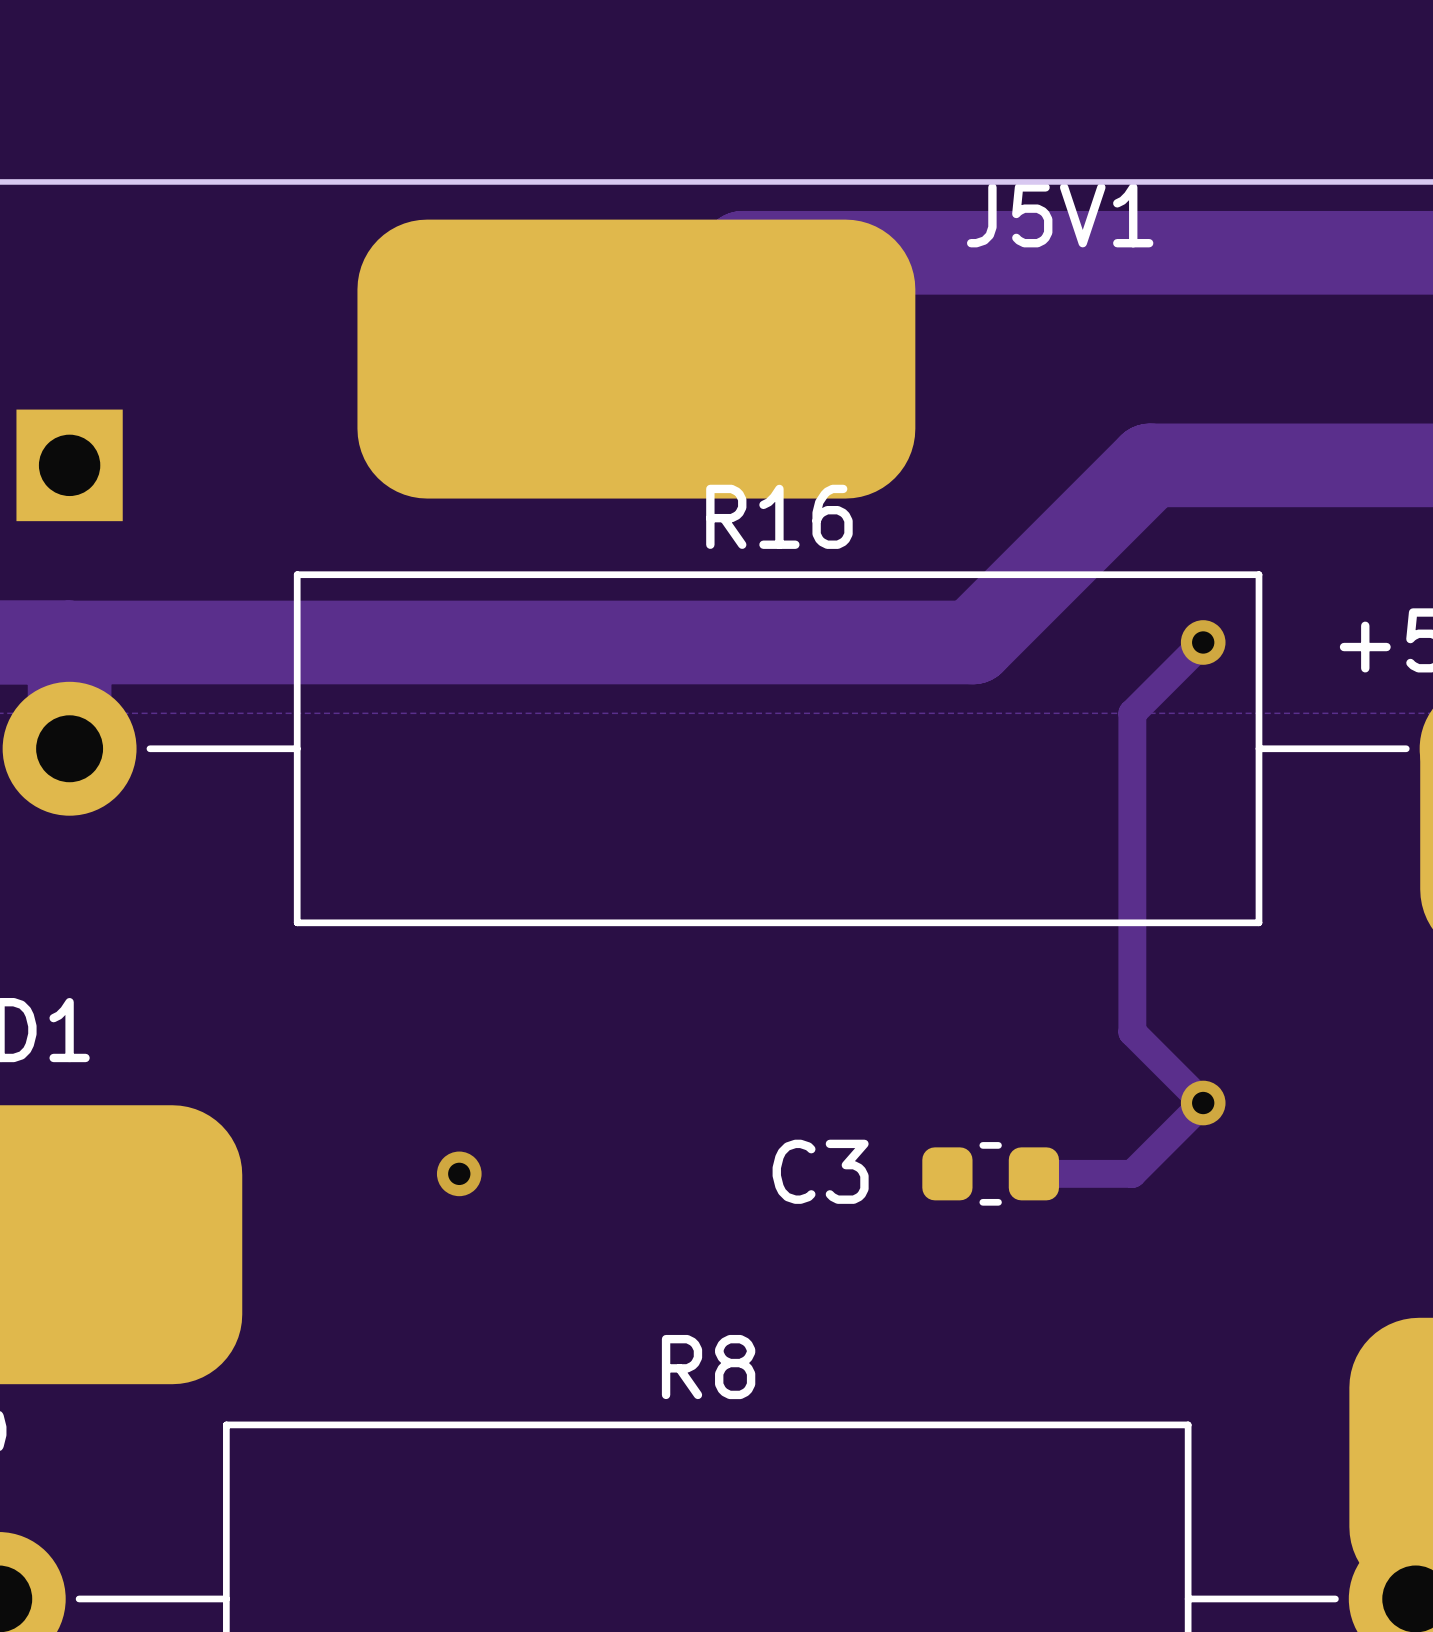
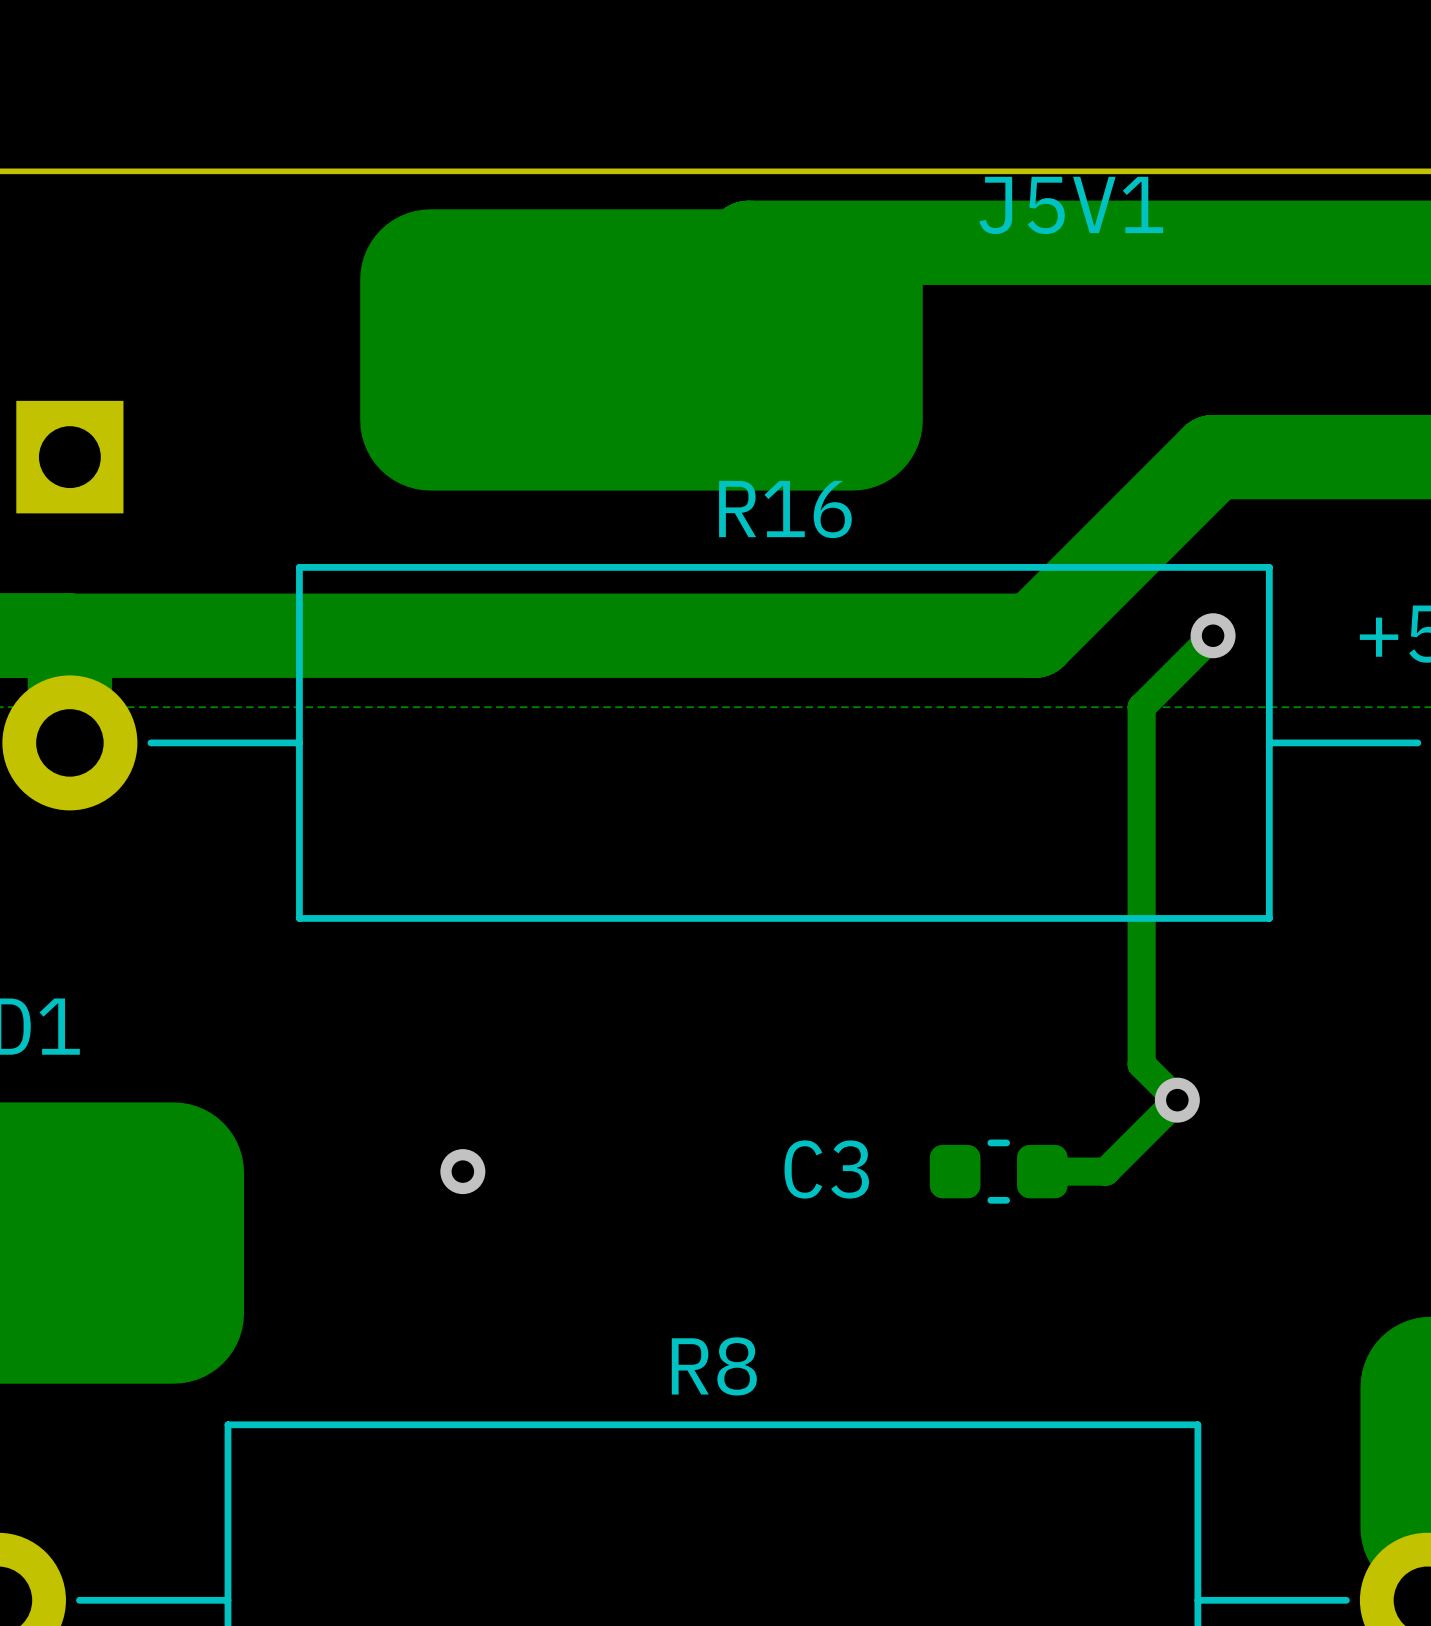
track: (1203, 465) (1150, 465) (972, 642) -> (1213, 457) (1034, 635) (980, 635)
track: (1132, 1032) (1203, 1103) (1132, 1173) (1096, 1173) -> (1141, 1028) (1141, 1064) (1177, 1100) (1105, 1171)
via position: (1203, 1103) -> (1177, 1100)

